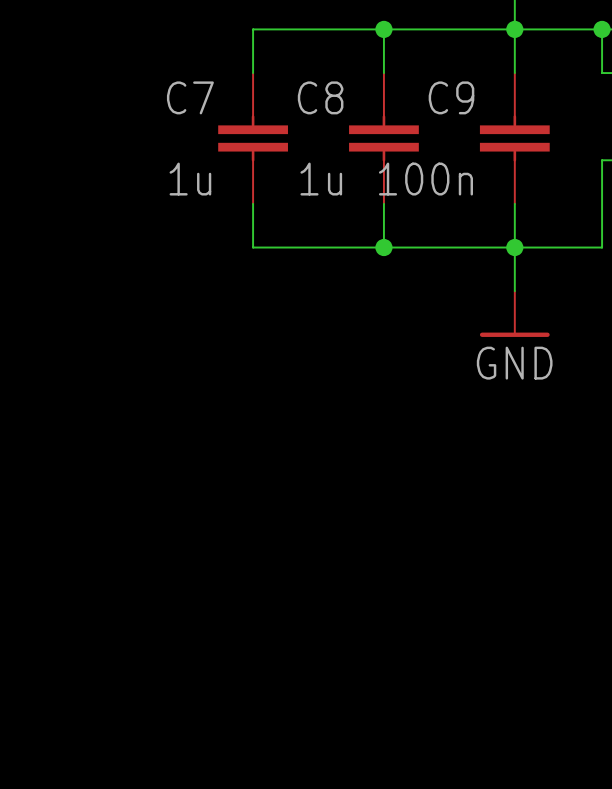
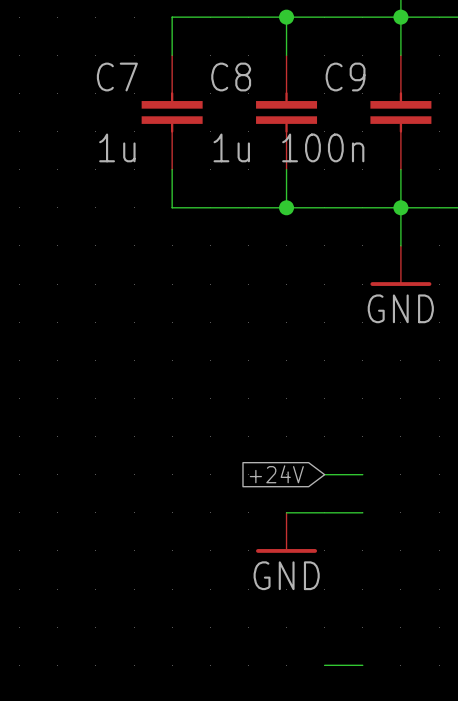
global label: none -> +24V (276, 474)
wire: none -> (324, 474) (362, 474)
wire: none -> (286, 512) (362, 512)
power symbol: none -> GND (286, 532)
wire: none -> (324, 665) (362, 665)

